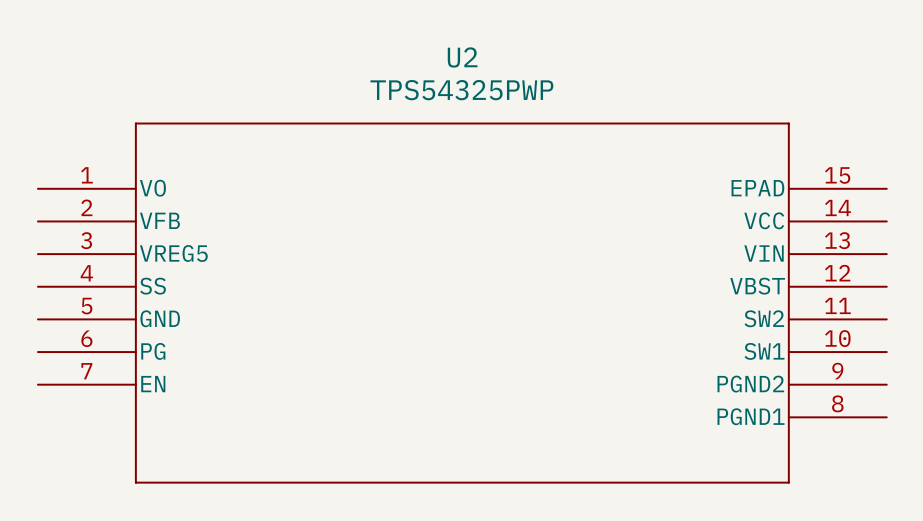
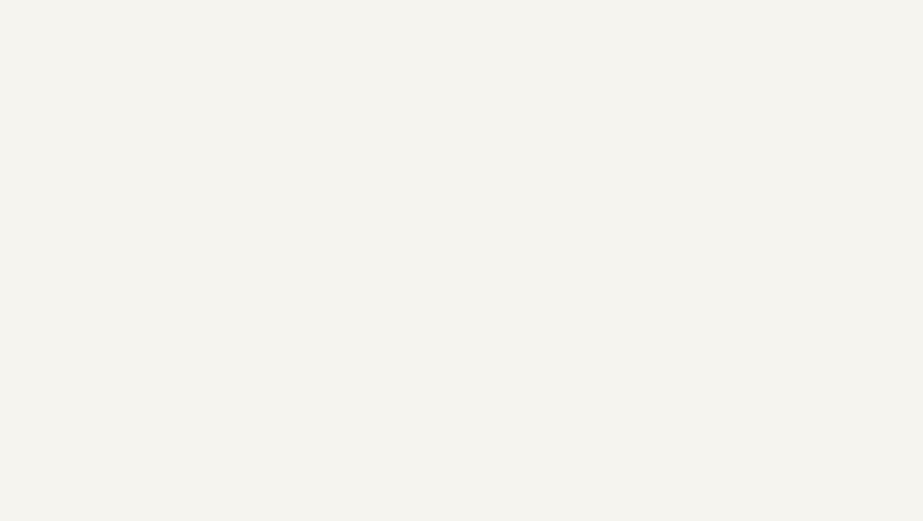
U2: TPS54325PWP (462, 303) -> none

